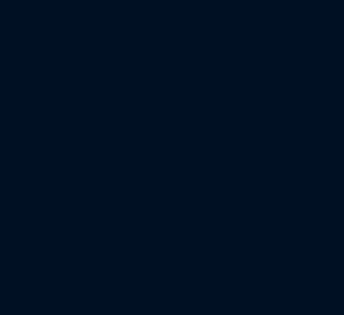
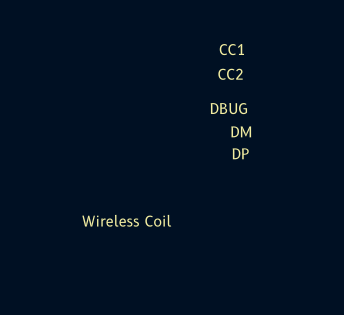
text: none -> CC1 (231, 49)
text: none -> CC2 (230, 74)
text: none -> DBUG (228, 108)
text: none -> DM (241, 131)
text: none -> DP (240, 153)
text: none -> Wireless Coil (126, 220)

